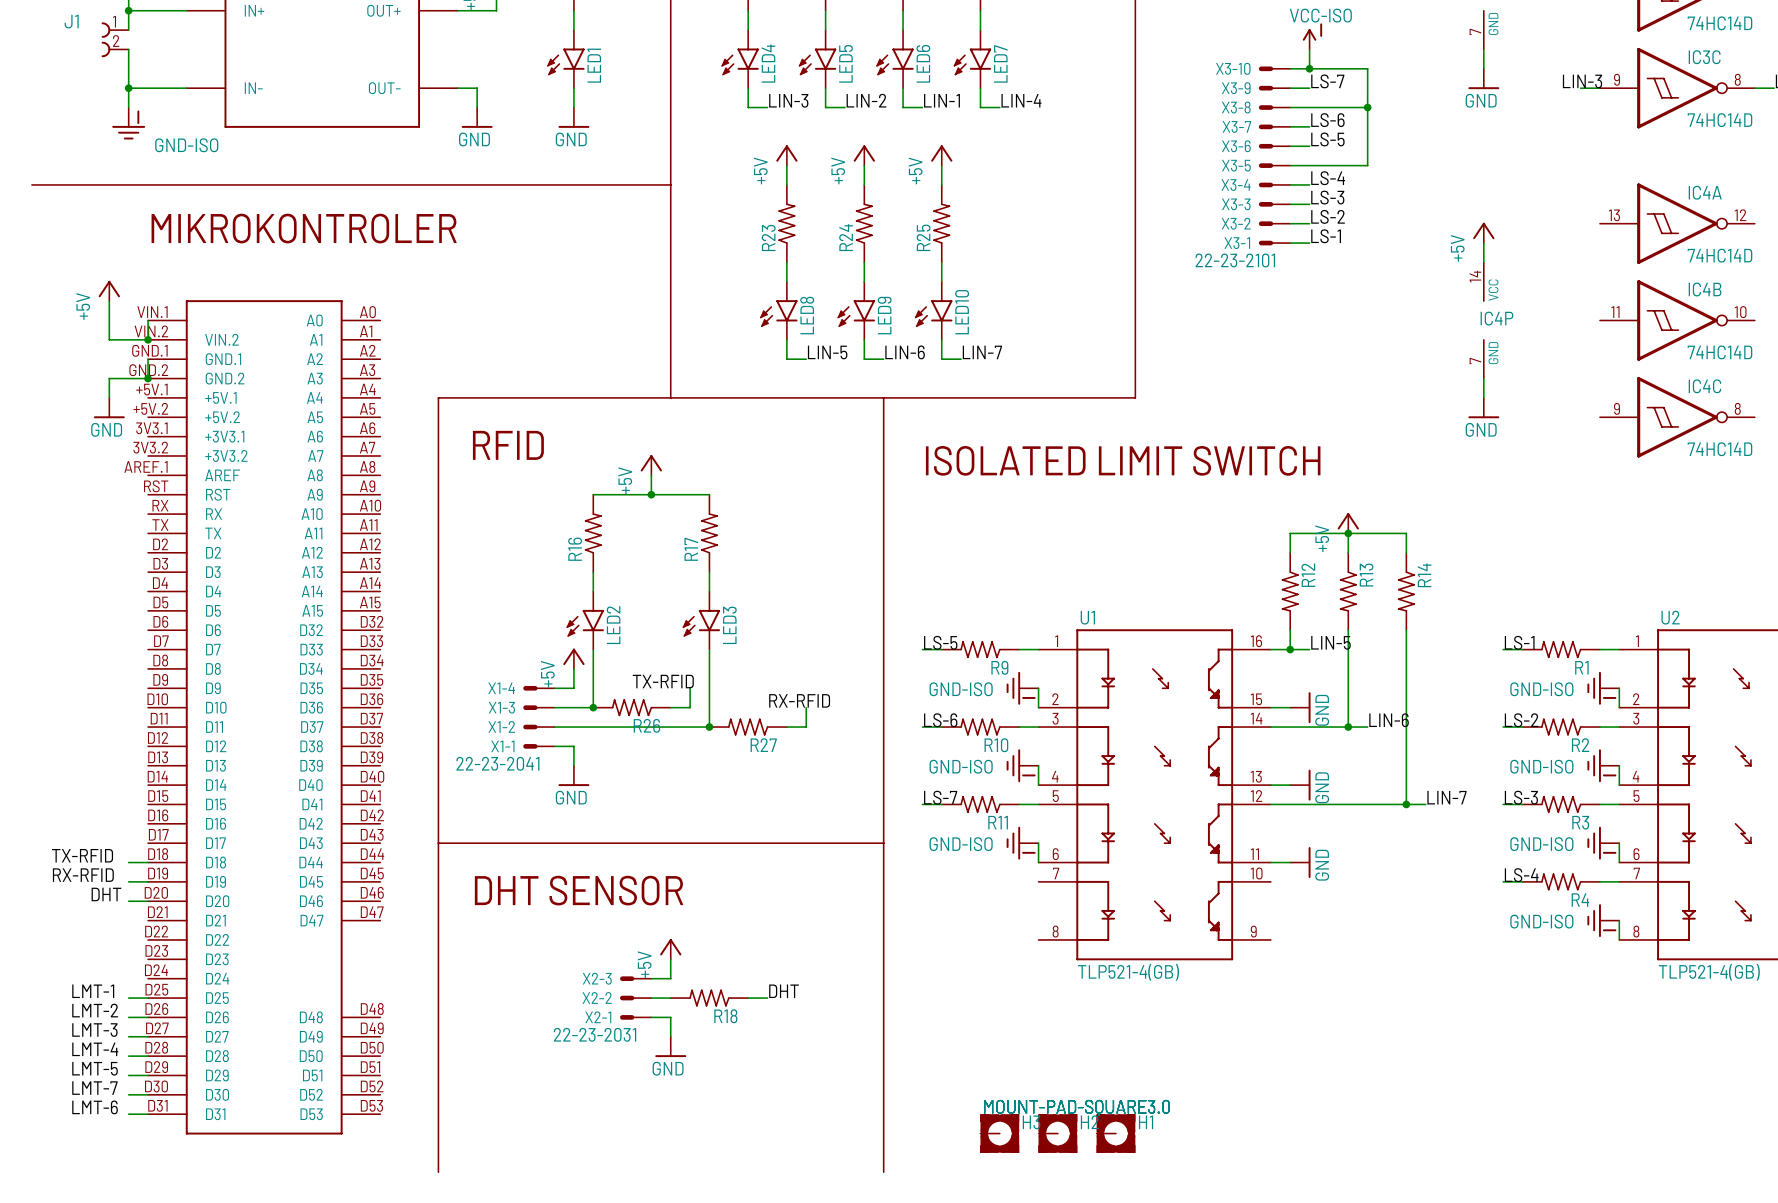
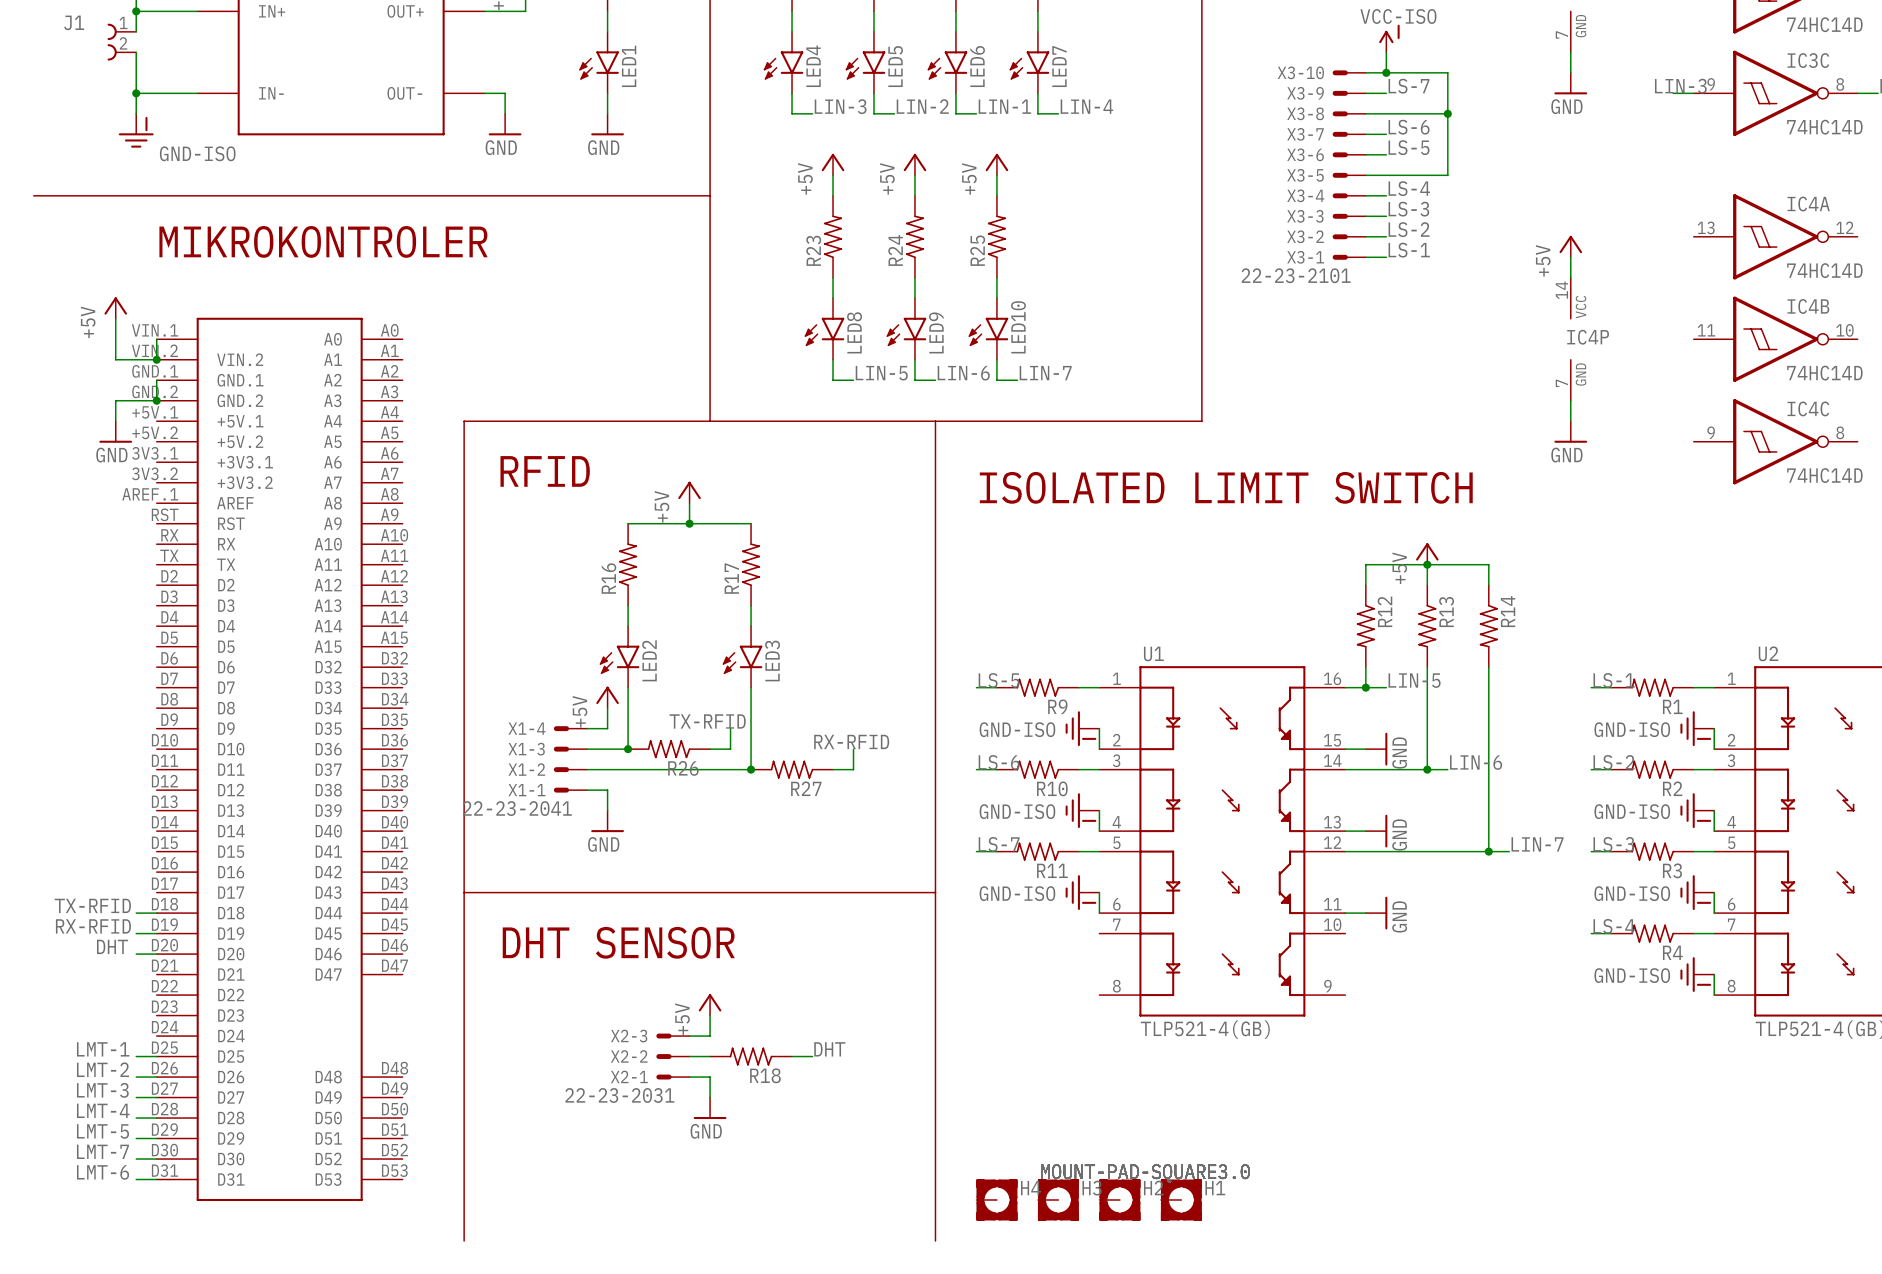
H4: none -> MOUNT-PAD-SQUARE3.0 (996, 1199)

